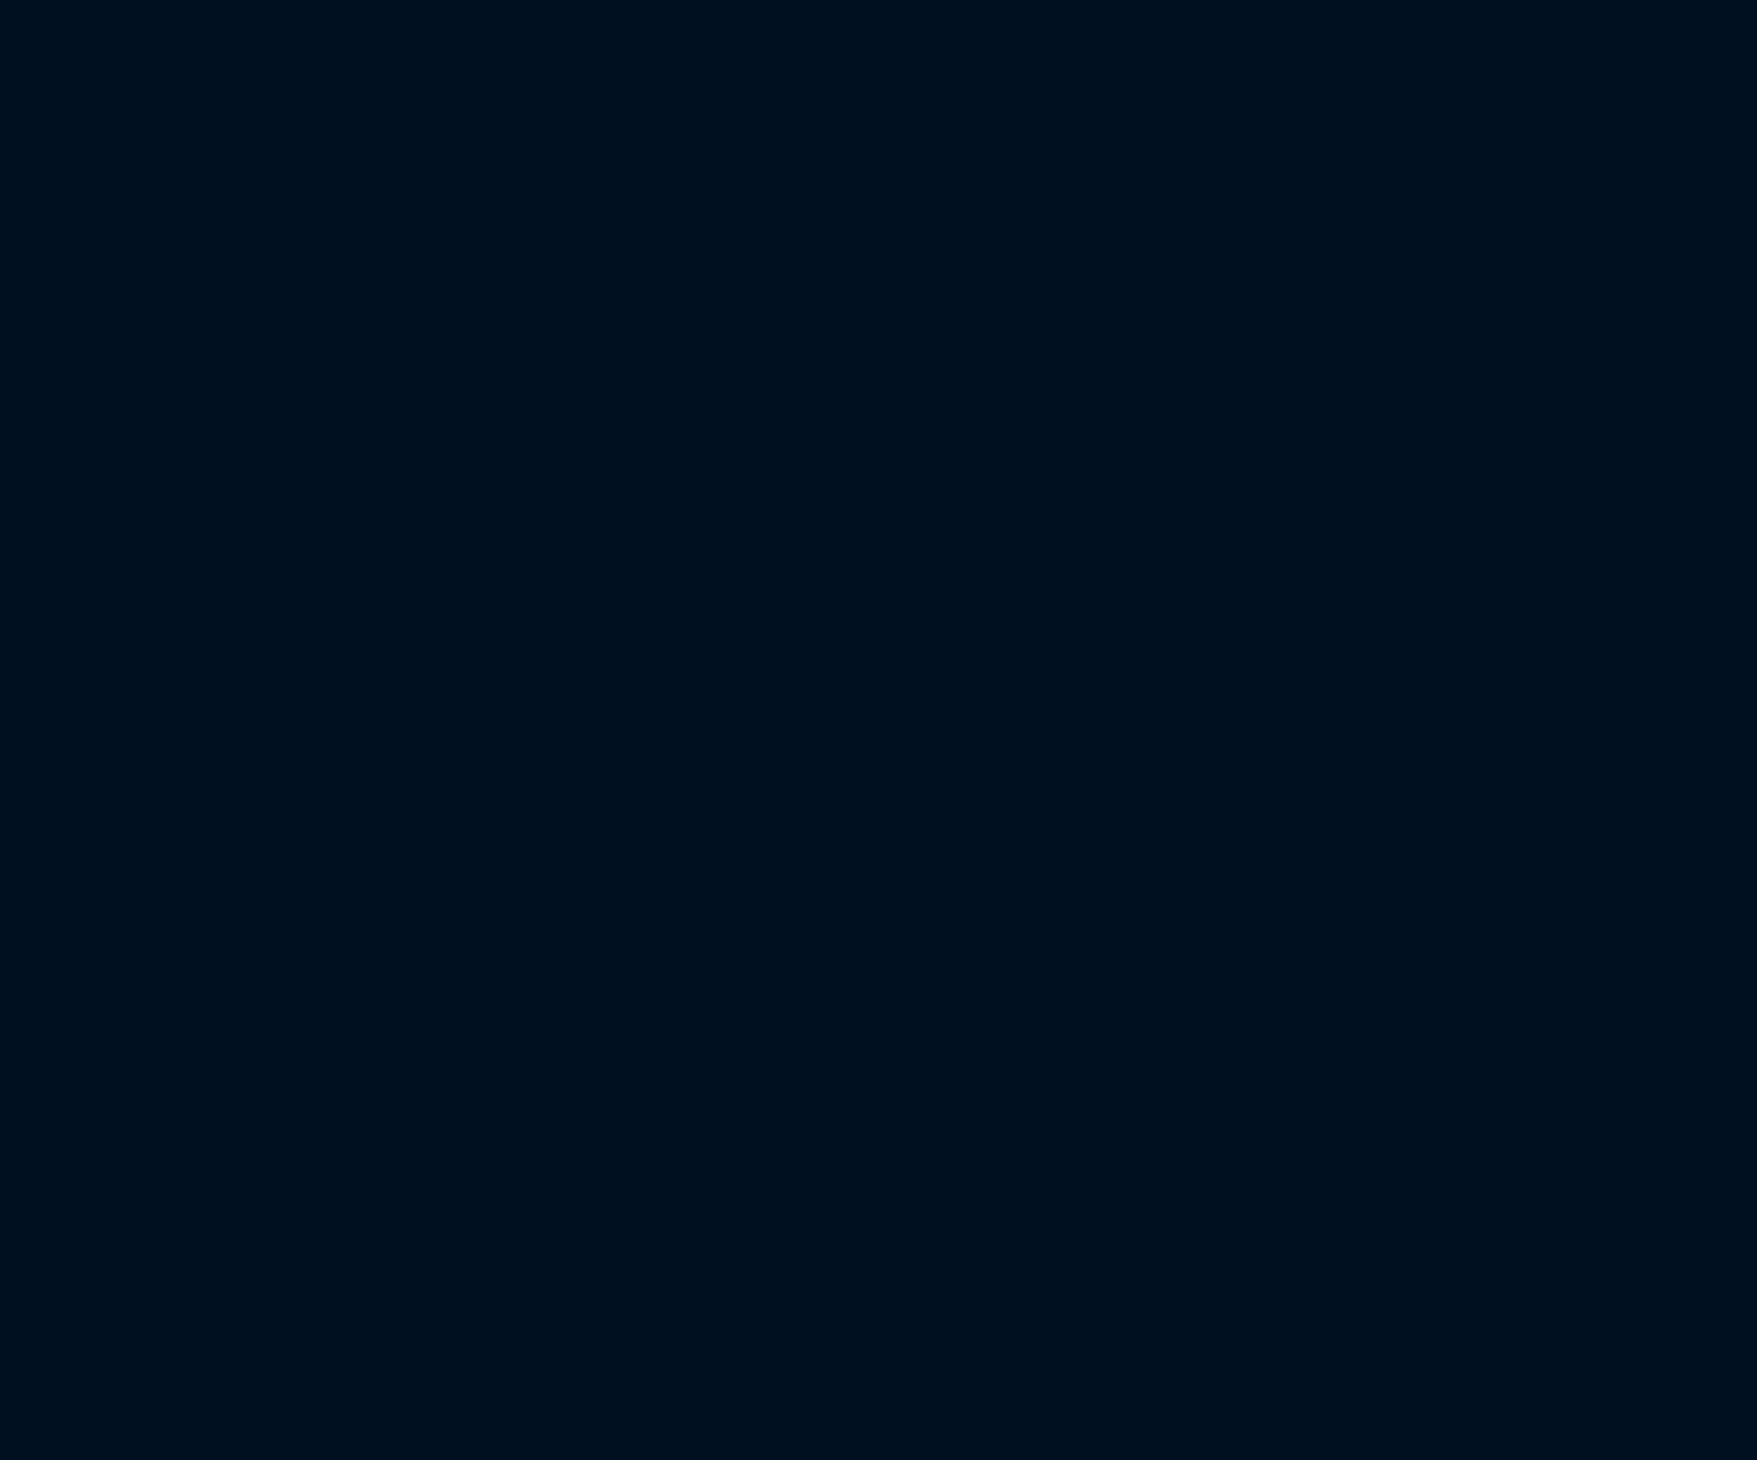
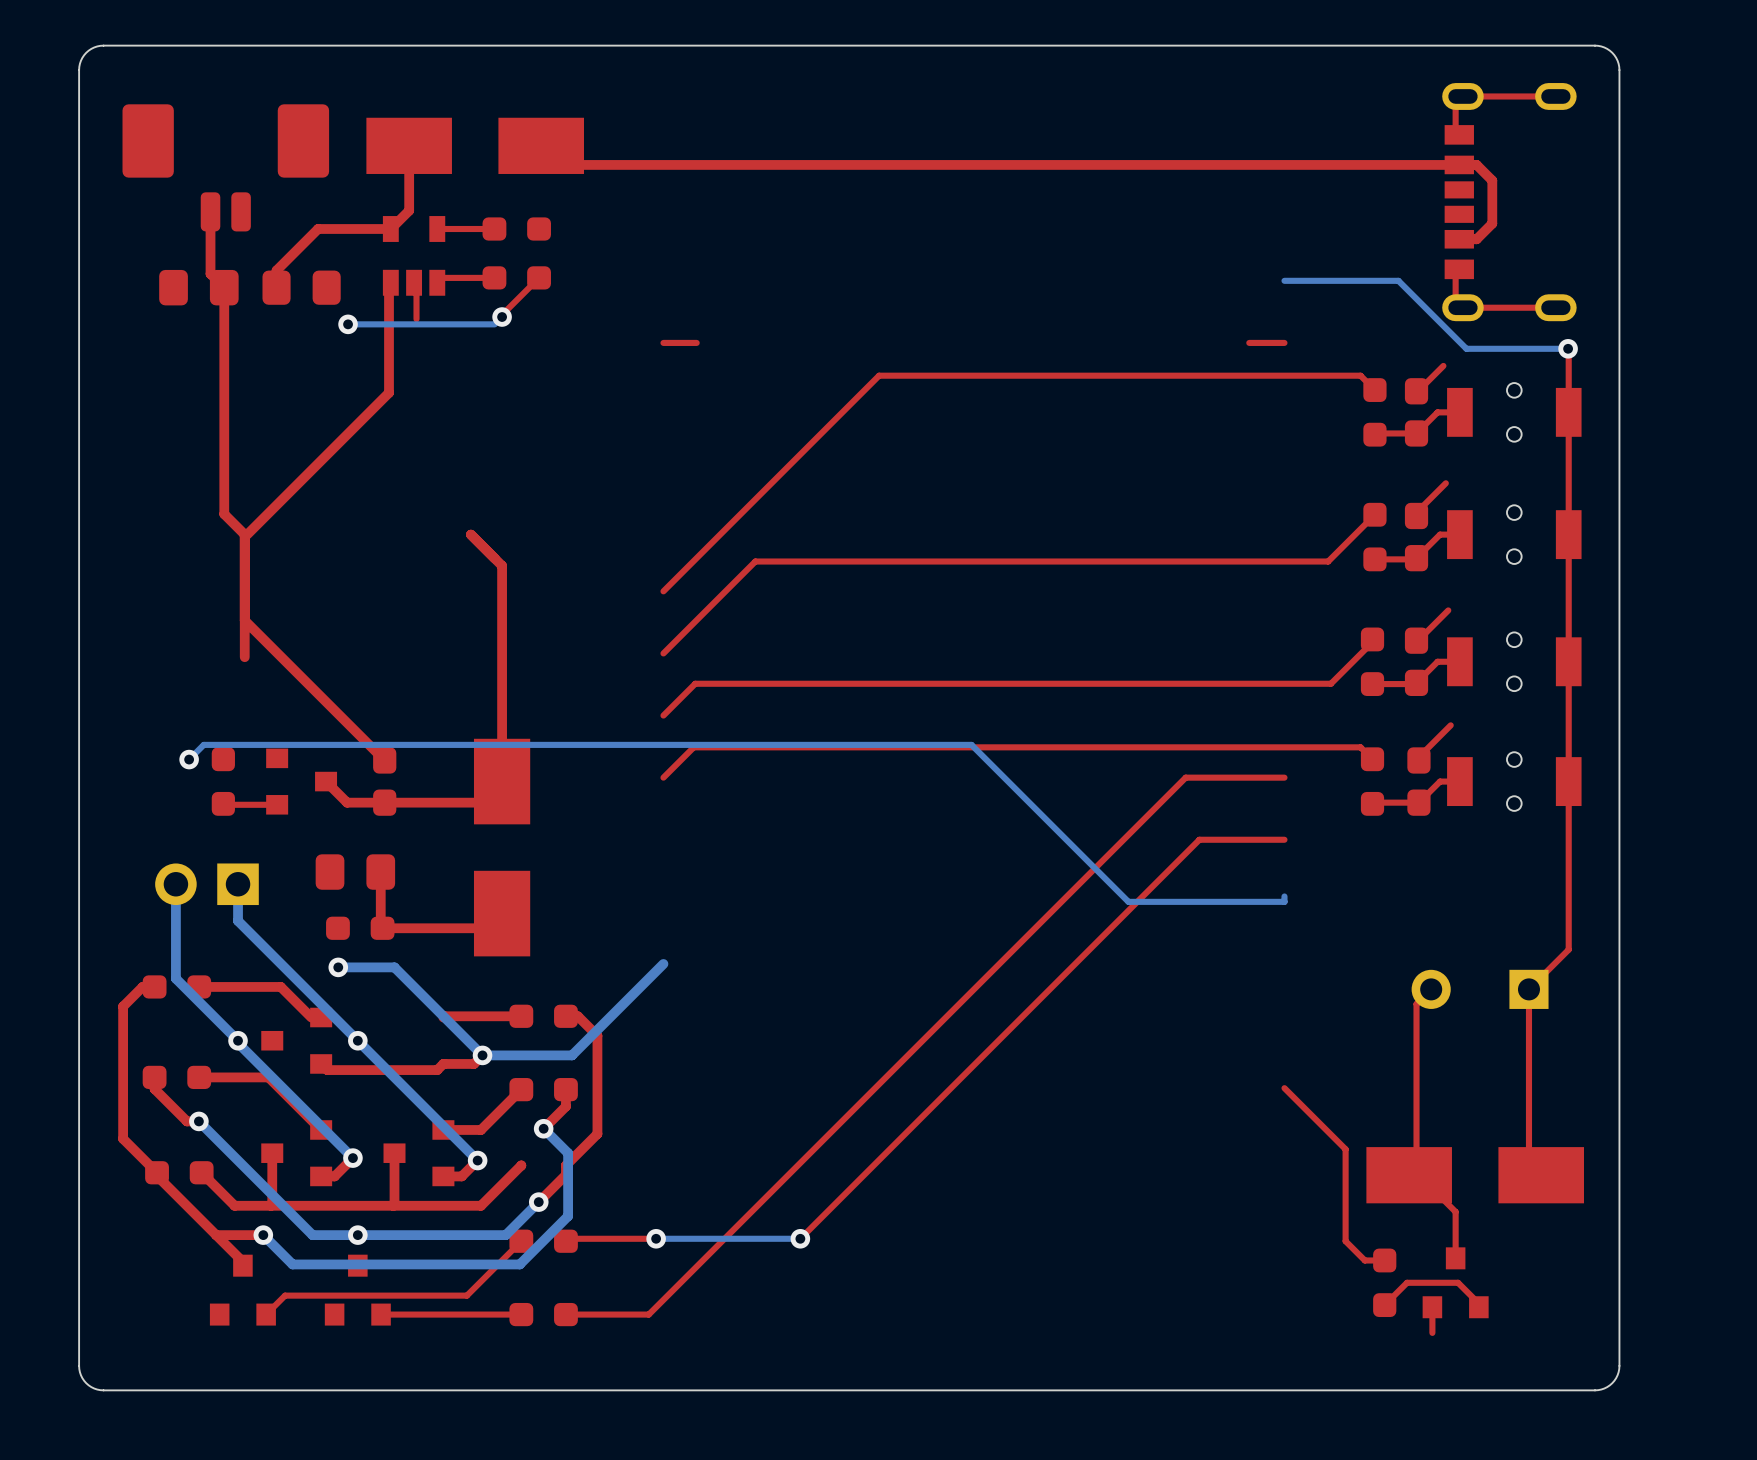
board edge: none -> (1595, 45) (103, 45) (94, 47) (86, 52) (80, 60) (79, 70) (79, 1365) (80, 1375) (86, 1383) (94, 1388) (103, 1390) (1595, 1390) (1604, 1388) (1612, 1383) (1617, 1375) (1619, 1365) (1619, 70) (1617, 60) (1612, 52) (1604, 47) (1595, 45)
top track: none -> (1548, 96) (1455, 96) (1455, 131) (1451, 134)
top track: none -> (409, 145) (409, 210) (390, 228) (318, 228) (276, 270) (276, 287)
part: none -> (475, 145)
top track: none -> (541, 145) (560, 164) (1476, 164) (1492, 180) (1492, 223) (1476, 239) (1451, 239)
part: none -> (225, 167)
part: none -> (1509, 202)
top track: none -> (210, 211) (210, 273) (224, 287) (224, 514) (244, 534) (244, 657)
top track: none -> (494, 228) (437, 228)
part: none -> (516, 228)
part: none -> (414, 255)
top track: none -> (1451, 269) (1455, 273) (1455, 307) (1548, 307)
top track: none -> (494, 277) (442, 277) (437, 282)
part: none -> (516, 277)
top track: none -> (539, 277) (502, 317)
bottom track: none -> (1284, 280) (1398, 280) (1466, 348) (1568, 348)
top track: none -> (389, 282) (389, 392) (247, 534)
part: none -> (198, 287)
part: none -> (301, 287)
top track: none -> (416, 292) (416, 319)
via: none -> (502, 317)
via: none -> (348, 324)
bottom track: none -> (494, 324) (348, 324)
top track: none -> (696, 342) (663, 342)
top track: none -> (1284, 342) (1249, 342)
top track: none -> (1568, 348) (1568, 949) (1528, 989) (1528, 1153) (1548, 1172)
via: none -> (1568, 348)
top track: none -> (1443, 365) (1416, 391)
top track: none -> (1374, 390) (1360, 375) (879, 375) (663, 591)
part: none -> (1374, 412)
part: none -> (1416, 412)
top track: none -> (1459, 412) (1437, 412) (1416, 433) (1374, 434)
part: none -> (1514, 412)
top track: none -> (1445, 483) (1416, 512) (1416, 515)
top track: none -> (1370, 514) (1374, 514) (1328, 561) (755, 561) (663, 653)
top track: none -> (470, 534) (502, 565) (502, 781) (481, 802) (347, 802) (326, 781)
top track: none -> (1459, 534) (1440, 534) (1415, 559) (1374, 559)
part: none -> (1514, 534)
part: none -> (1374, 537)
part: none -> (1416, 537)
top track: none -> (1448, 610) (1416, 640)
top track: none -> (244, 620) (384, 760)
top track: none -> (1372, 639) (1372, 642) (1330, 683) (695, 683) (663, 715)
part: none -> (1372, 661)
part: none -> (1416, 661)
top track: none -> (1459, 661) (1437, 661) (1415, 684) (1372, 684)
part: none -> (1514, 661)
top track: none -> (1450, 725) (1418, 757) (1418, 760)
bottom track: none -> (189, 759) (203, 744) (971, 744) (1128, 901) (1284, 901) (1284, 896)
via: none -> (189, 759)
top track: none -> (1372, 759) (1360, 747) (693, 747) (663, 777)
top track: none -> (1284, 777) (1185, 777) (648, 1314) (565, 1314)
part: none -> (223, 781)
part: none -> (301, 781)
part: none -> (384, 781)
part: none -> (1372, 781)
part: none -> (1418, 781)
top track: none -> (1459, 781) (1440, 781) (1418, 802) (1372, 803)
part: none -> (1514, 781)
top track: none -> (223, 803) (277, 804)
top track: none -> (1284, 839) (1199, 839) (800, 1238)
part: none -> (502, 847)
part: none -> (355, 872)
top track: none -> (380, 872) (380, 926) (382, 928) (487, 928) (502, 913)
bottom track: none -> (175, 884) (175, 978) (352, 1158)
part: none -> (206, 884)
bottom track: none -> (238, 884) (238, 920) (477, 1160)
part: none -> (360, 928)
bottom track: none -> (663, 963) (572, 1055) (482, 1055) (394, 967) (338, 967)
via: none -> (338, 967)
top track: none -> (154, 986) (142, 986) (123, 1006) (123, 1138) (157, 1172) (157, 1175) (242, 1261) (242, 1265)
part: none -> (176, 986)
top track: none -> (199, 986) (280, 986) (311, 1017)
top track: none -> (1431, 989) (1416, 1004) (1416, 1172) (1455, 1211) (1455, 1258)
part: none -> (1480, 989)
top track: none -> (521, 1016) (443, 1017)
part: none -> (543, 1016)
top track: none -> (565, 1016) (577, 1016) (597, 1035) (597, 1133) (565, 1165) (565, 1174) (538, 1202)
via: none -> (238, 1040)
part: none -> (296, 1040)
via: none -> (357, 1040)
top track: none -> (482, 1055) (473, 1063) (443, 1063) (437, 1070) (327, 1070) (321, 1063)
via: none -> (482, 1055)
top track: none -> (154, 1077) (154, 1089) (186, 1121) (198, 1121)
part: none -> (176, 1077)
top track: none -> (199, 1077) (268, 1077) (321, 1129)
top track: none -> (1284, 1088) (1345, 1149) (1345, 1241) (1364, 1260) (1384, 1260)
top track: none -> (521, 1089) (481, 1129) (443, 1129)
part: none -> (543, 1089)
top track: none -> (565, 1089) (565, 1106) (543, 1128)
bottom track: none -> (198, 1121) (312, 1235) (505, 1235) (538, 1202)
via: none -> (198, 1121)
bottom track: none -> (543, 1128) (568, 1153) (568, 1216) (519, 1264) (292, 1264) (263, 1235)
via: none -> (543, 1128)
top track: none -> (272, 1153) (271, 1205)
part: none -> (296, 1153)
top track: none -> (394, 1153) (393, 1205)
part: none -> (418, 1153)
top track: none -> (352, 1158) (334, 1176) (321, 1176)
via: none -> (352, 1158)
top track: none -> (477, 1160) (461, 1176) (443, 1176)
via: none -> (477, 1160)
top track: none -> (521, 1165) (481, 1205) (234, 1205) (201, 1172)
part: none -> (179, 1172)
part: none -> (1475, 1175)
via: none -> (538, 1202)
top track: none -> (263, 1235) (216, 1235)
via: none -> (263, 1235)
via: none -> (357, 1235)
top track: none -> (656, 1238) (568, 1238) (565, 1241)
via: none -> (656, 1238)
bottom track: none -> (800, 1238) (656, 1238)
via: none -> (800, 1238)
top track: none -> (521, 1241) (466, 1295) (285, 1295) (266, 1314)
part: none -> (543, 1241)
part: none -> (1384, 1282)
part: none -> (1455, 1282)
part: none -> (242, 1290)
part: none -> (357, 1290)
top track: none -> (1384, 1305) (1407, 1282) (1458, 1282) (1478, 1303) (1478, 1307)
top track: none -> (1432, 1307) (1432, 1332)
top track: none -> (521, 1314) (381, 1314)
part: none -> (543, 1314)

